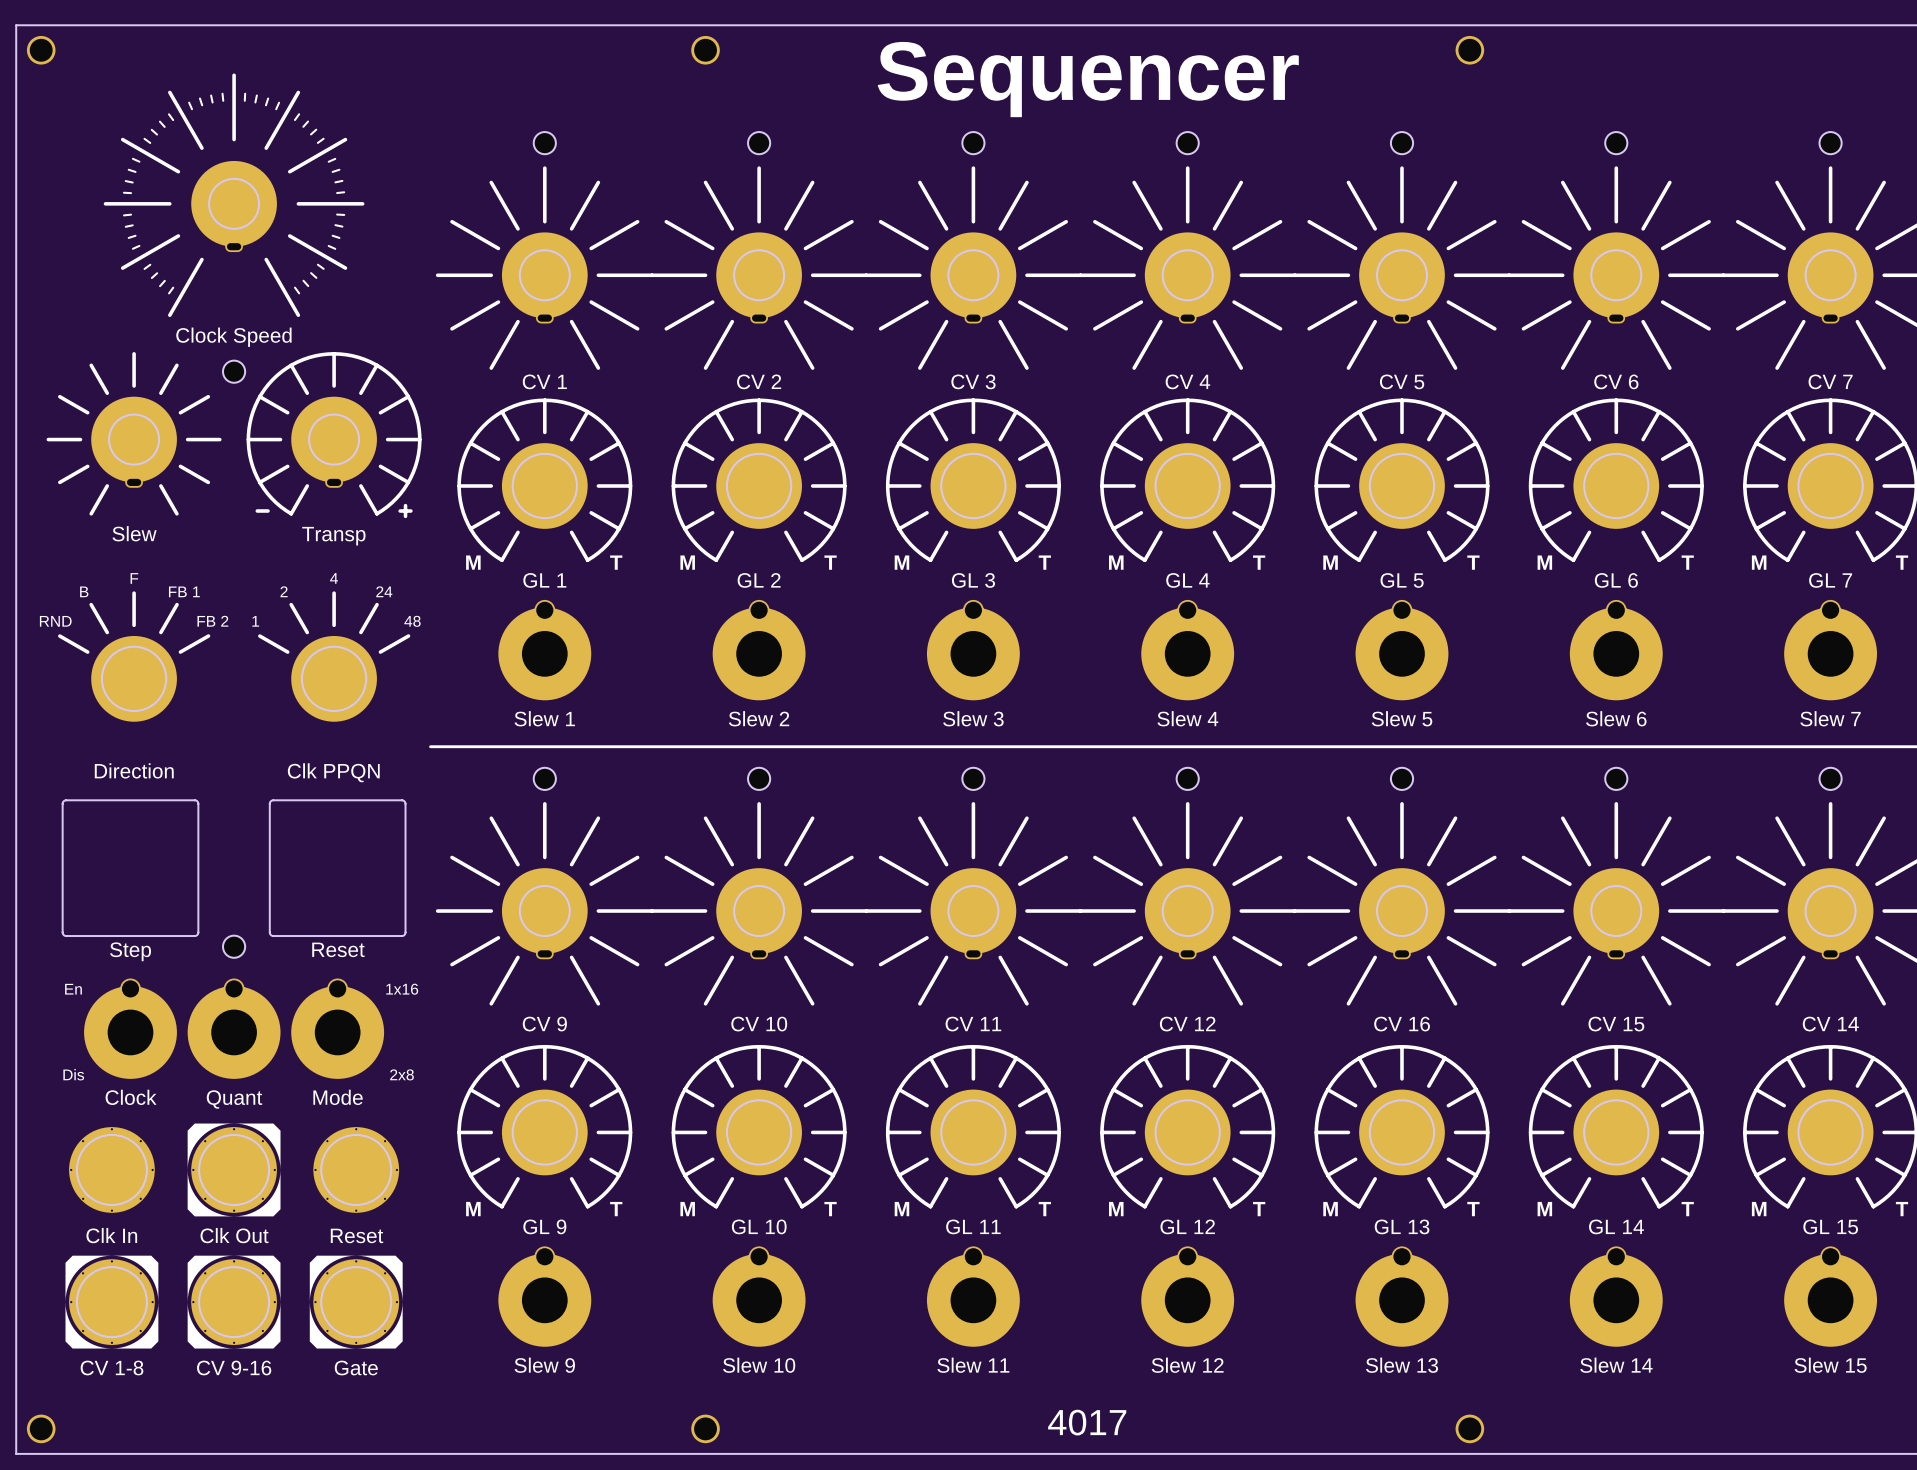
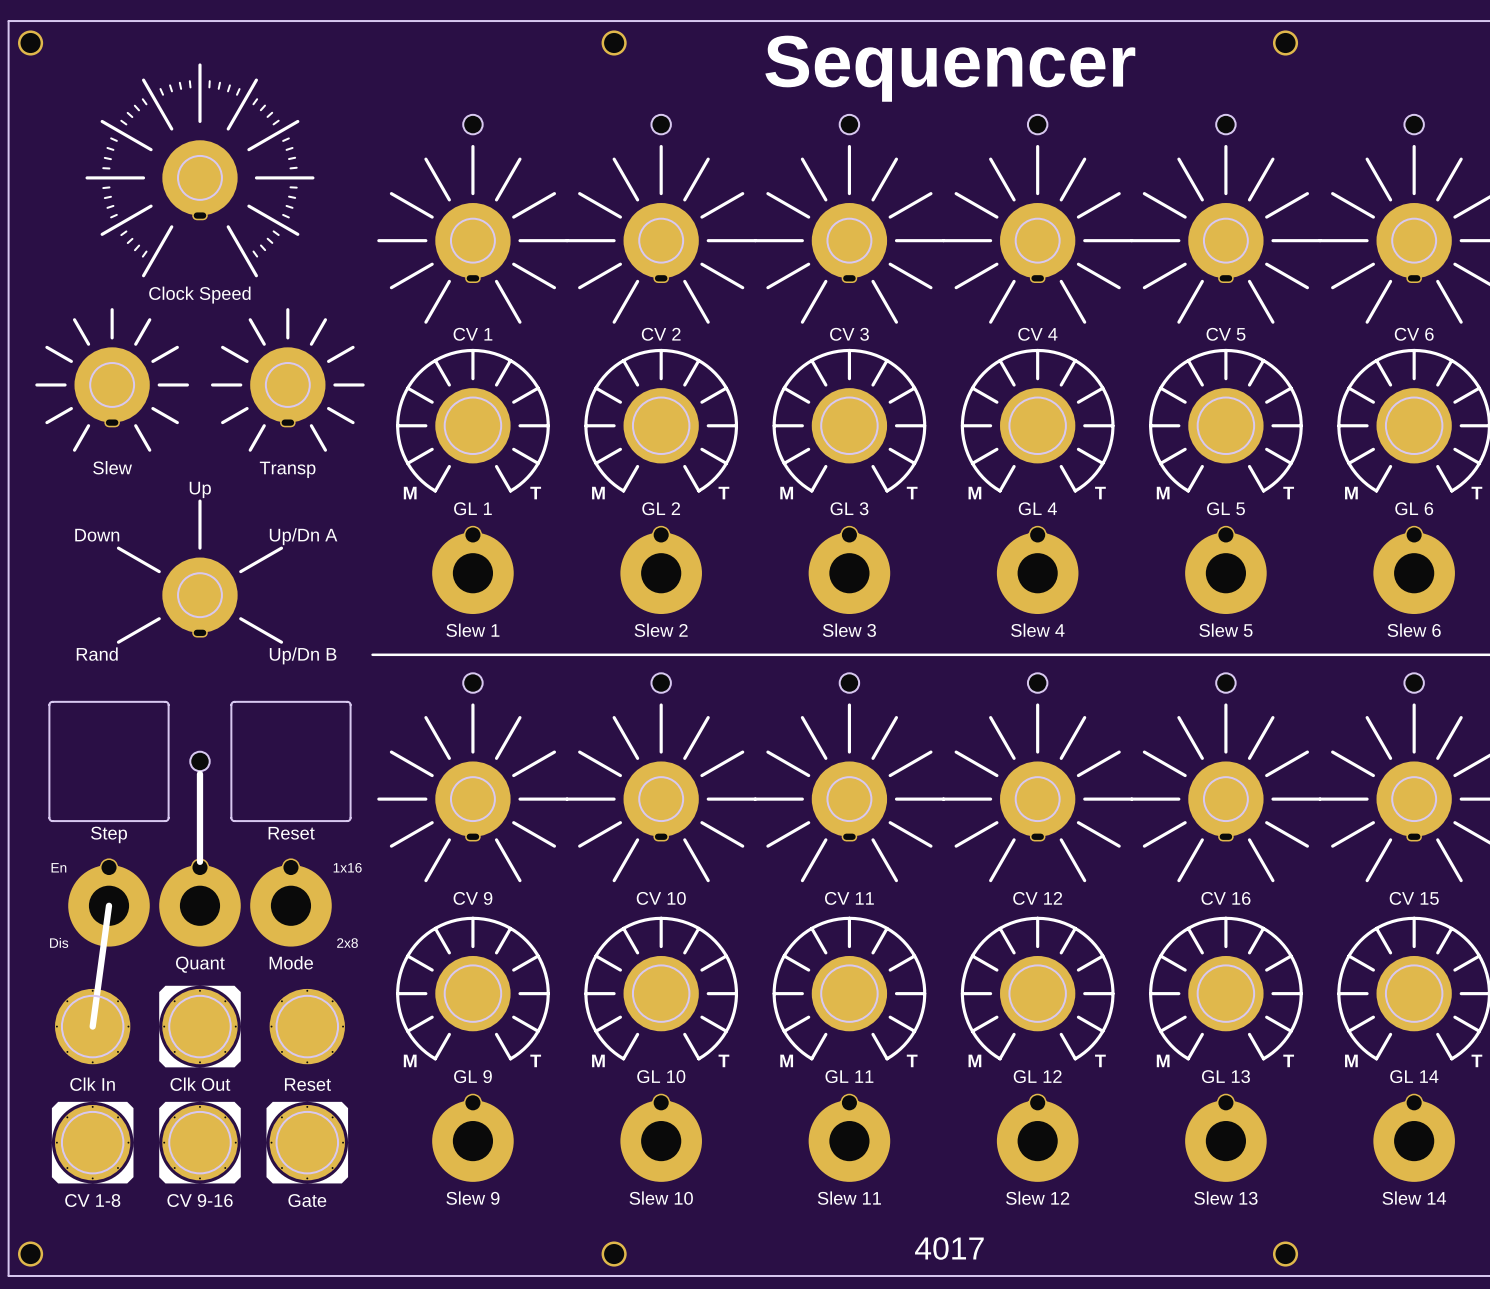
part footprint: [246, 352, 422, 519] -> [210, 308, 365, 452]
part: (234, 371) -> none
part: none -> (199, 571)
part: Direction (134, 656) -> none
part: Clk PPQN (334, 656) -> none
line: none -> (199, 774) (199, 861)
part position: (234, 946) -> (199, 761)
line: none -> (109, 905) (92, 1026)
part value: Clock (131, 1097) -> none

